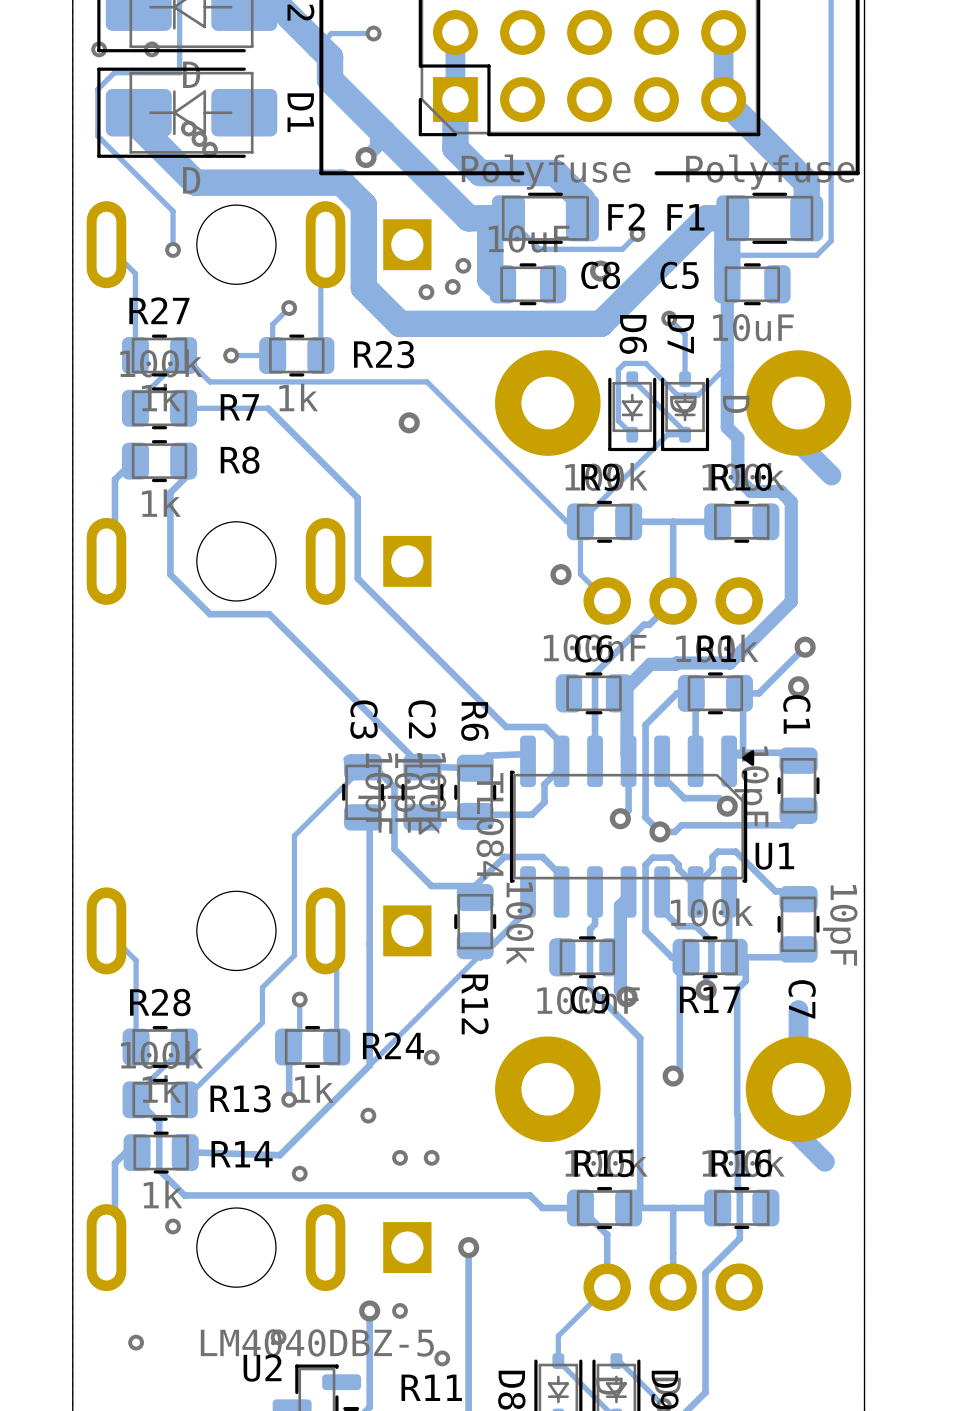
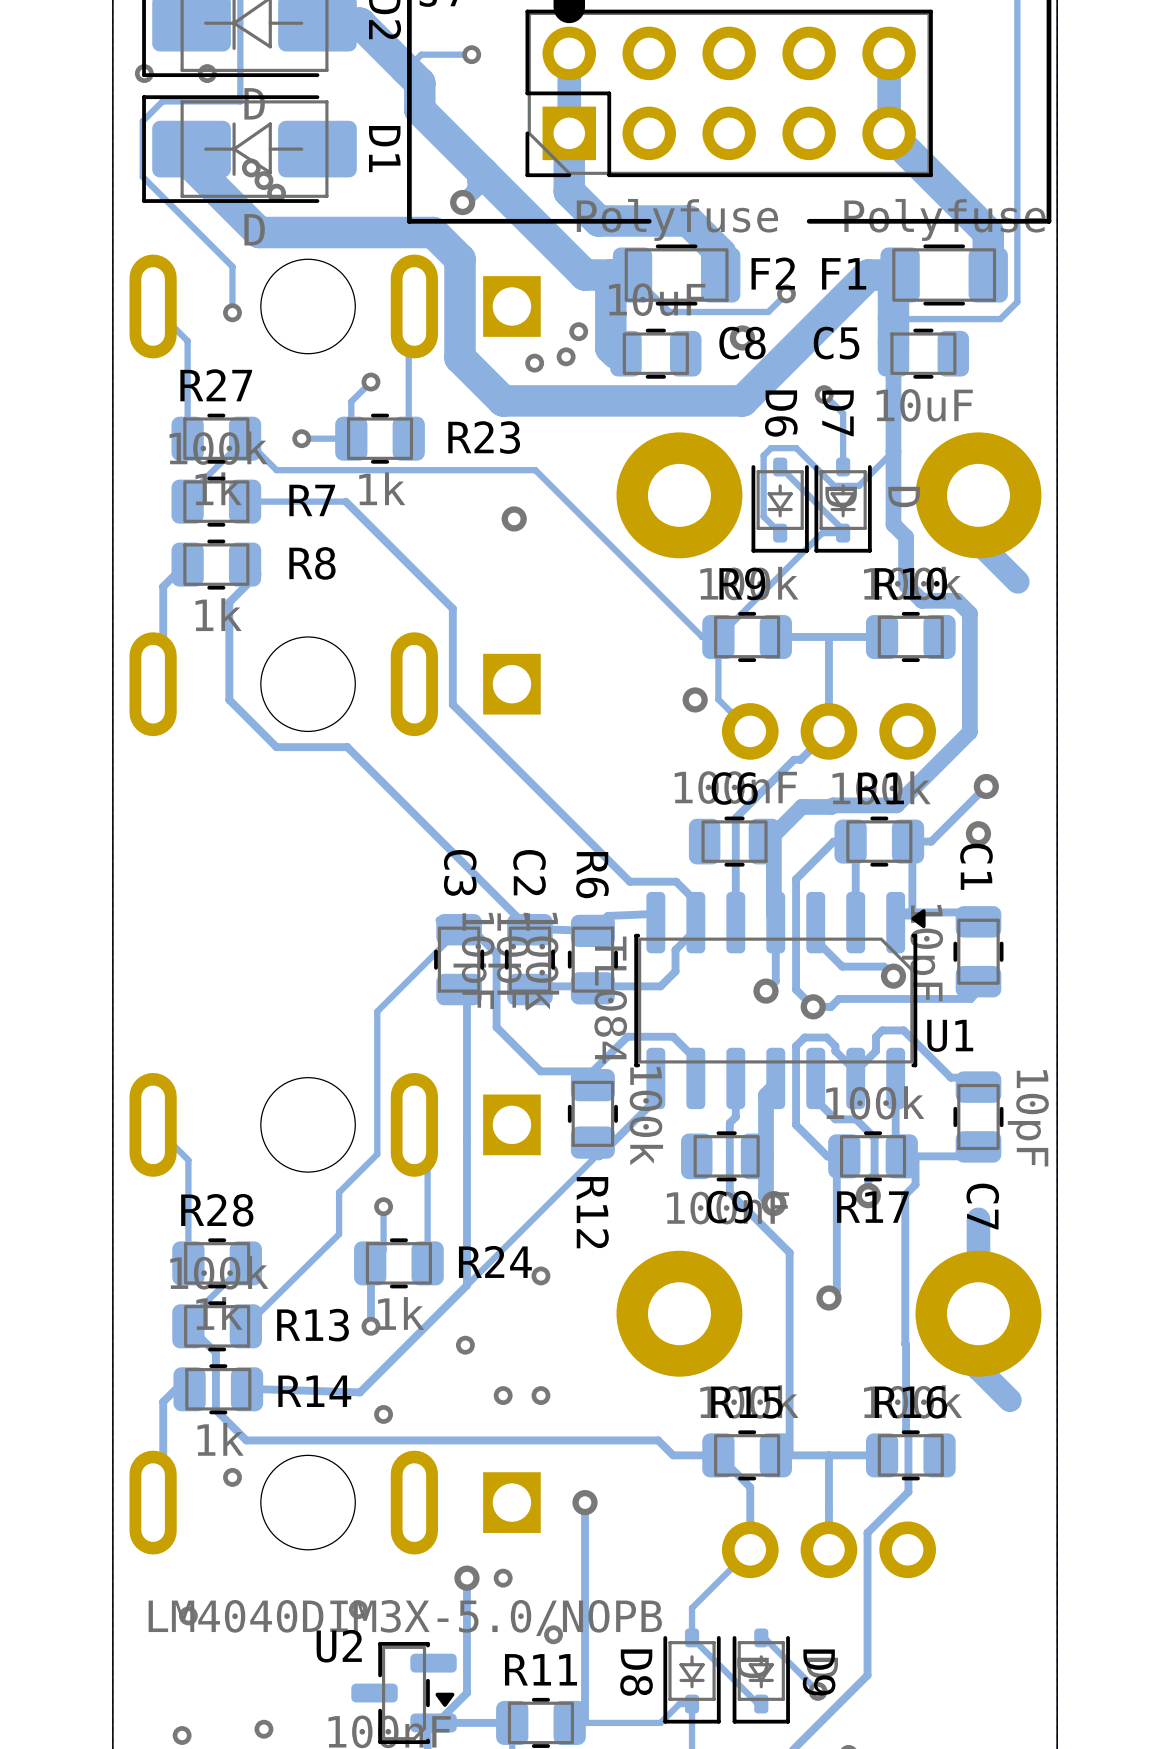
U2 value: LM4040DBZ-5 (317, 1342) -> LM4040DIM3X-5.0/NOPB (405, 1618)

